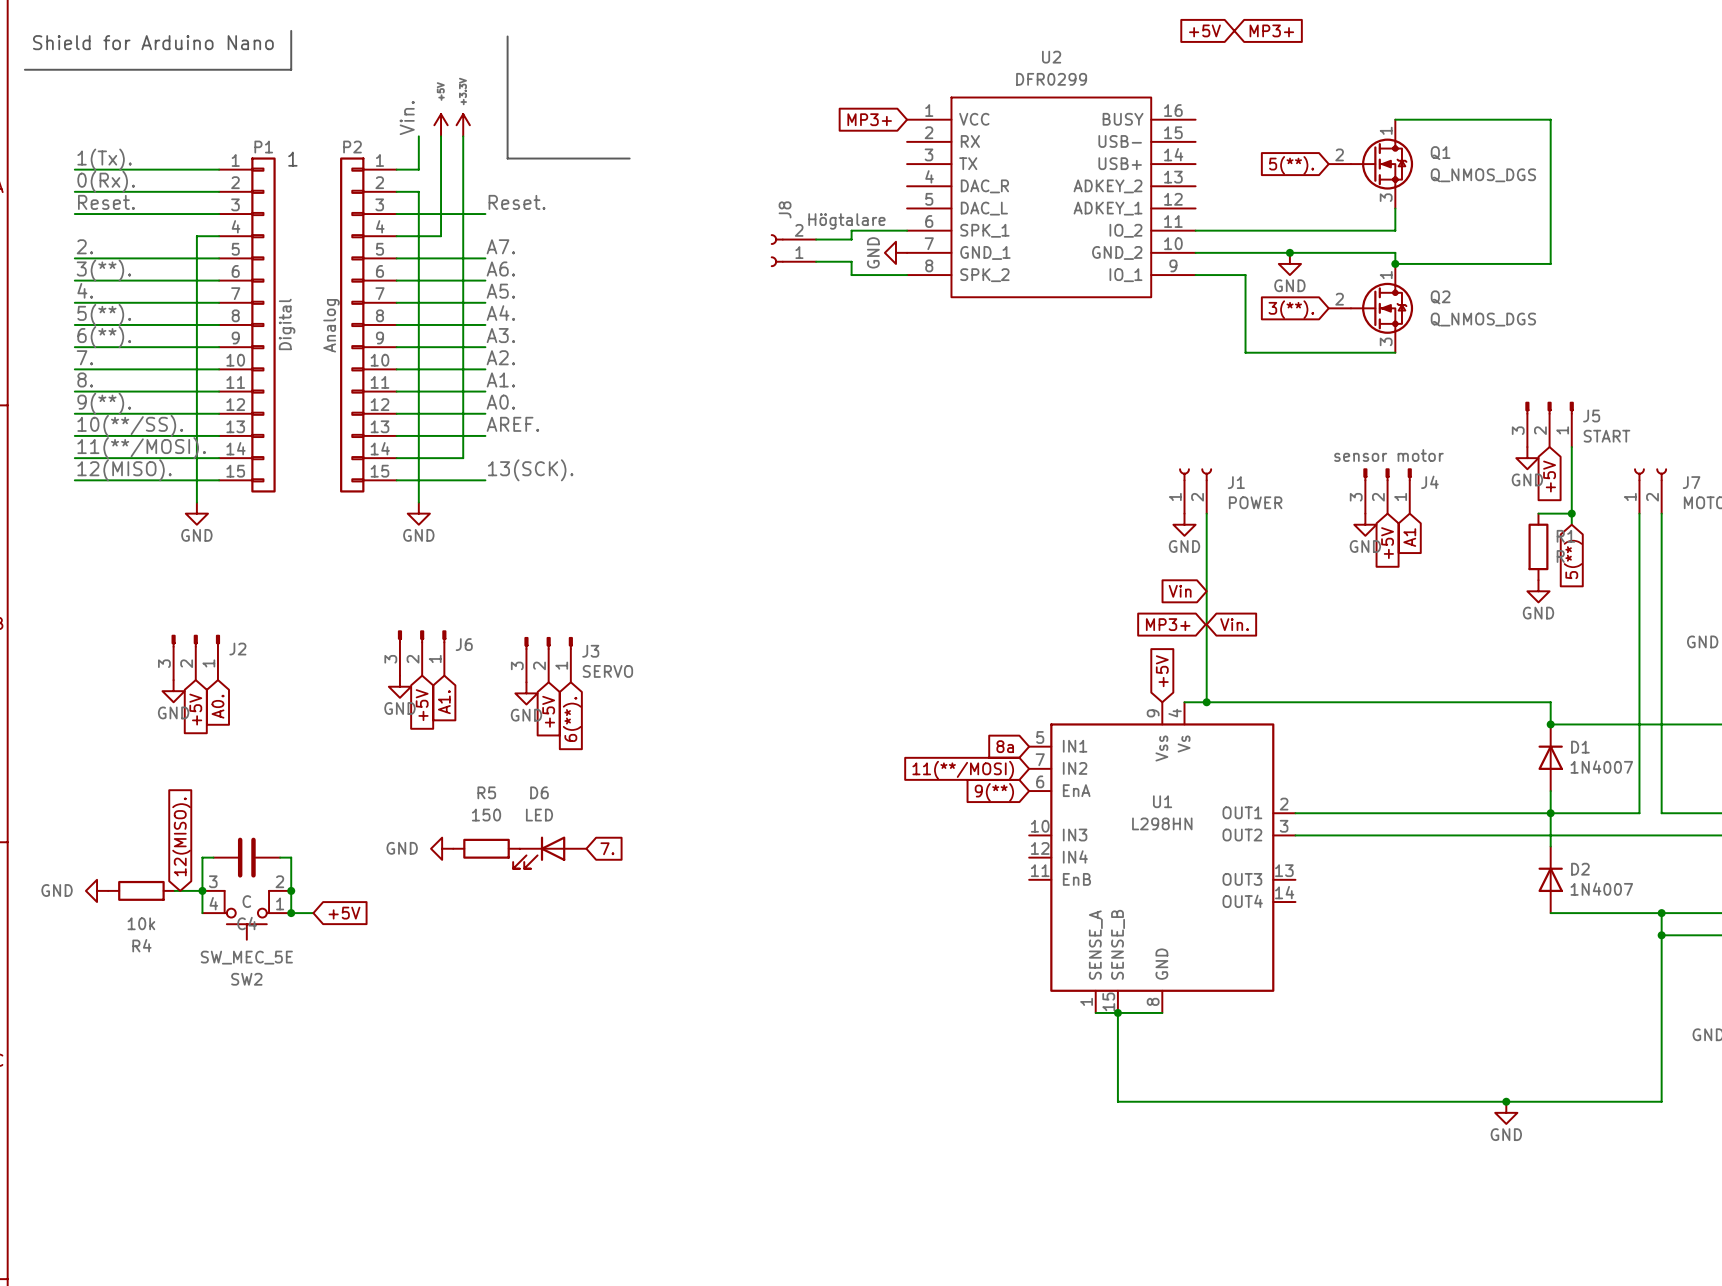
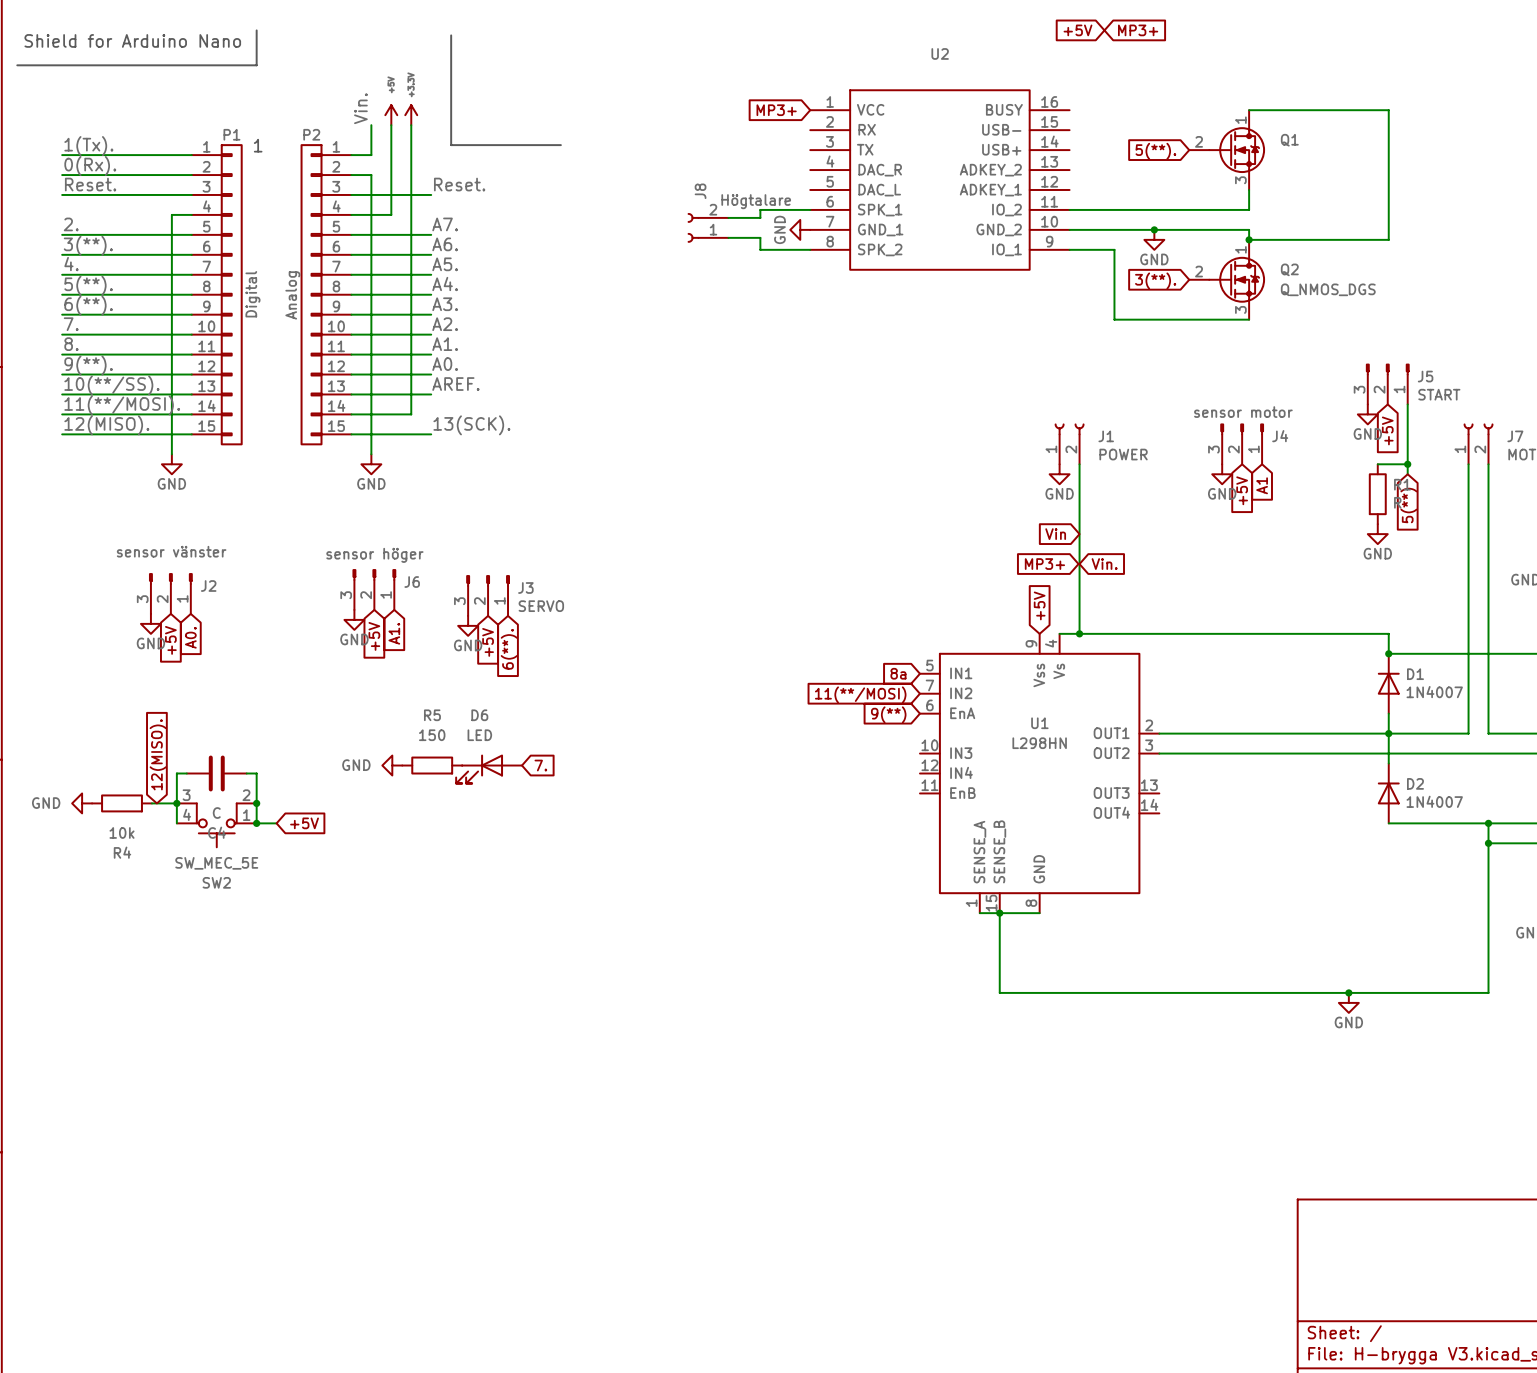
U2 value: DFR0299 (1051, 79) -> none
Q1 value: Q_NMOS_DGS (1483, 175) -> none
J2 value: none -> sensor vänster (171, 551)
J6 value: none -> sensor höger (374, 555)

